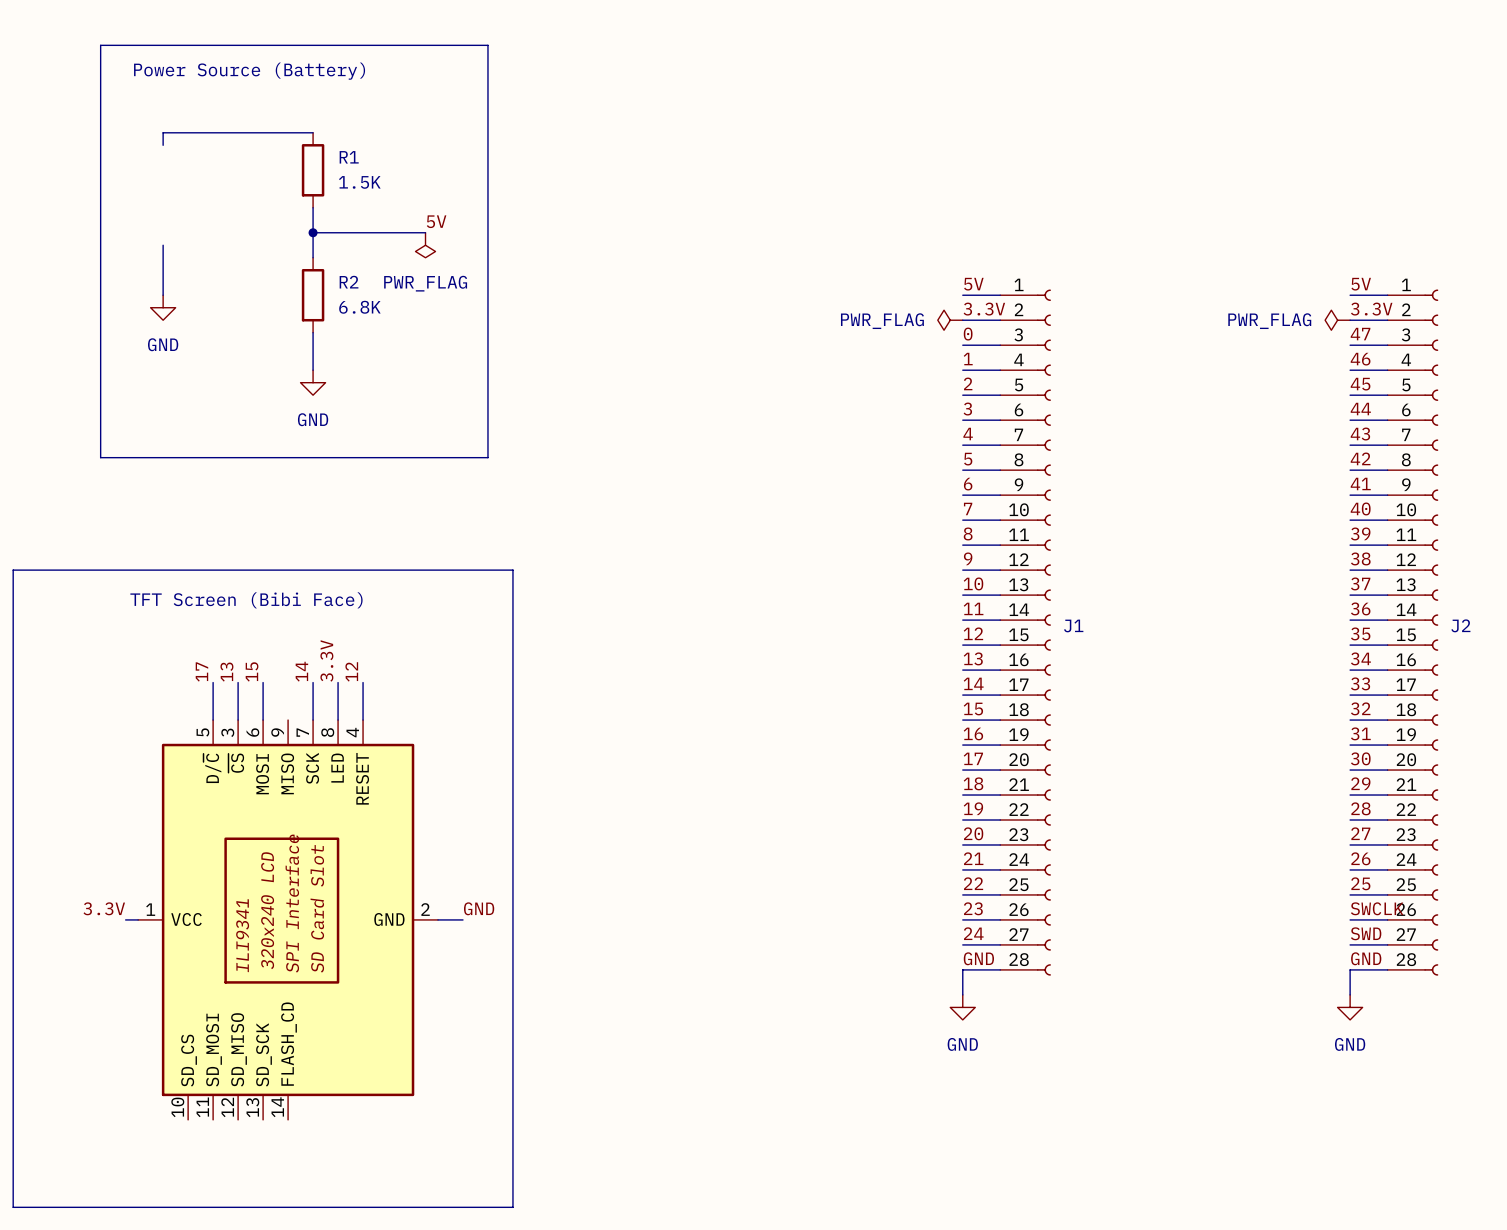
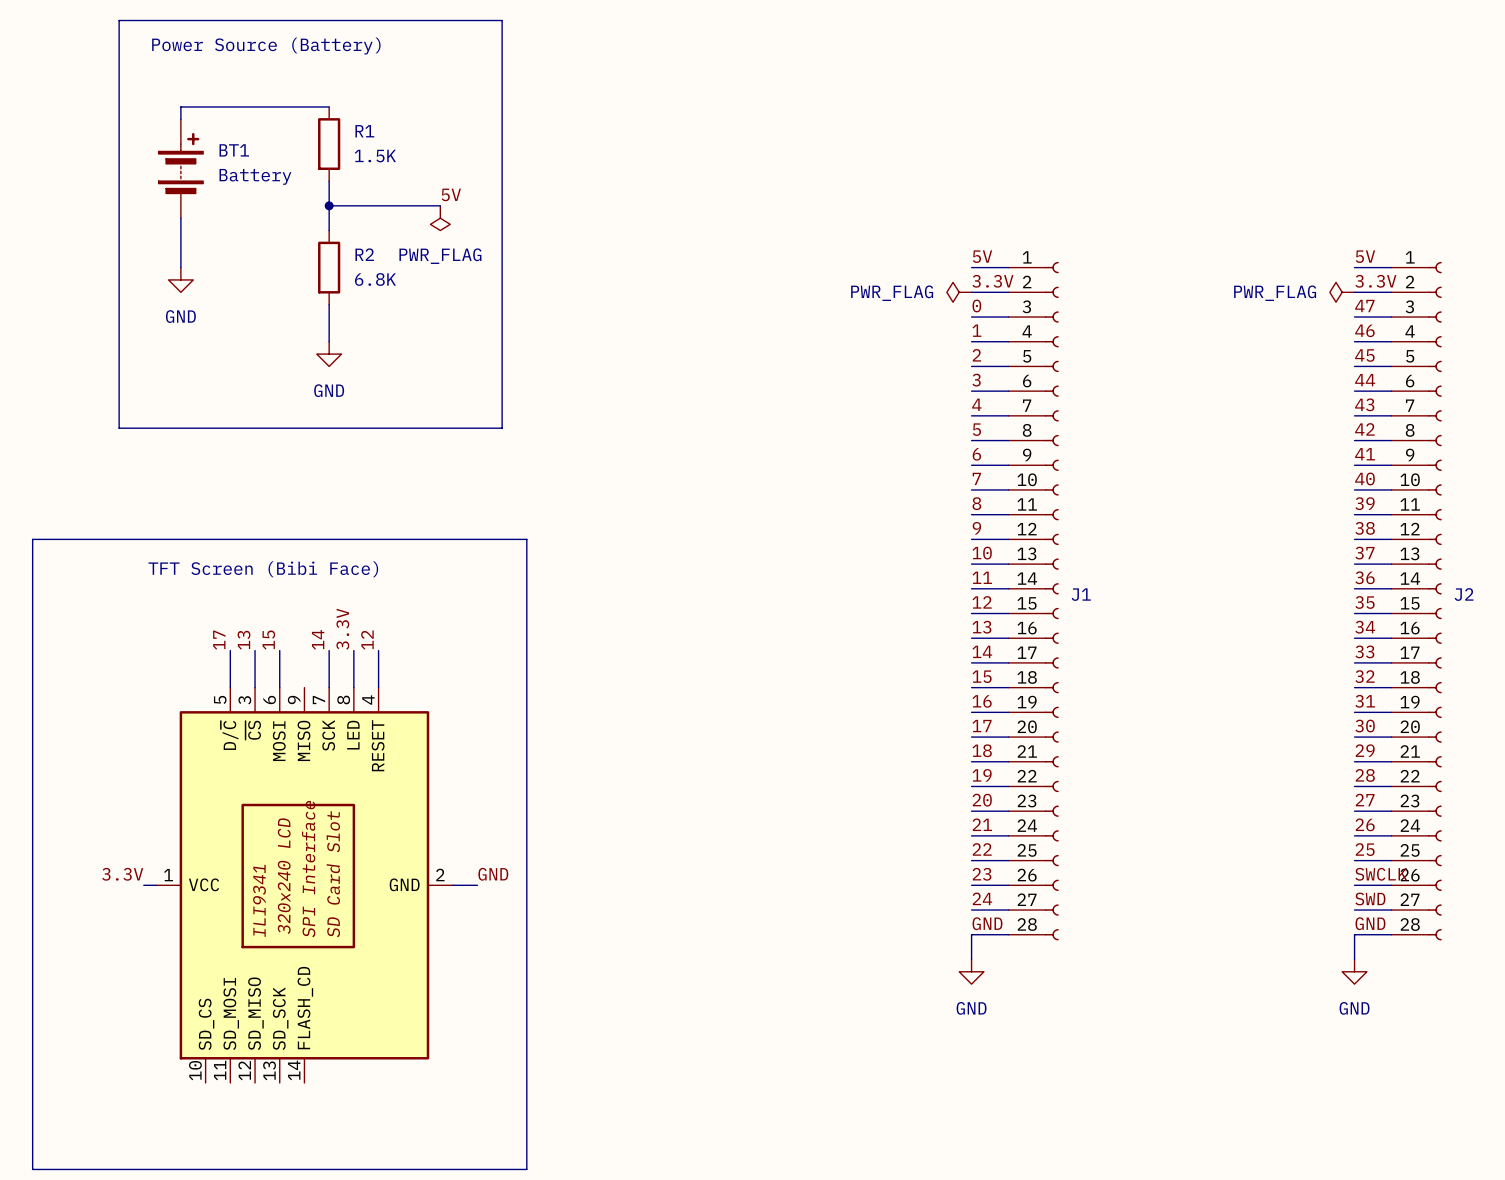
BT1: none -> Battery (180, 168)

